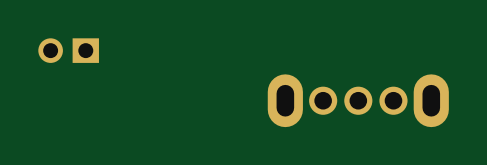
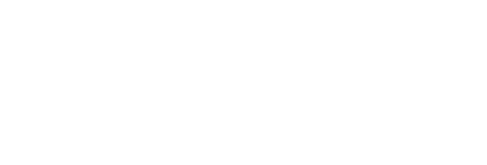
part: (68, 50) -> none
part: (358, 100) -> none

